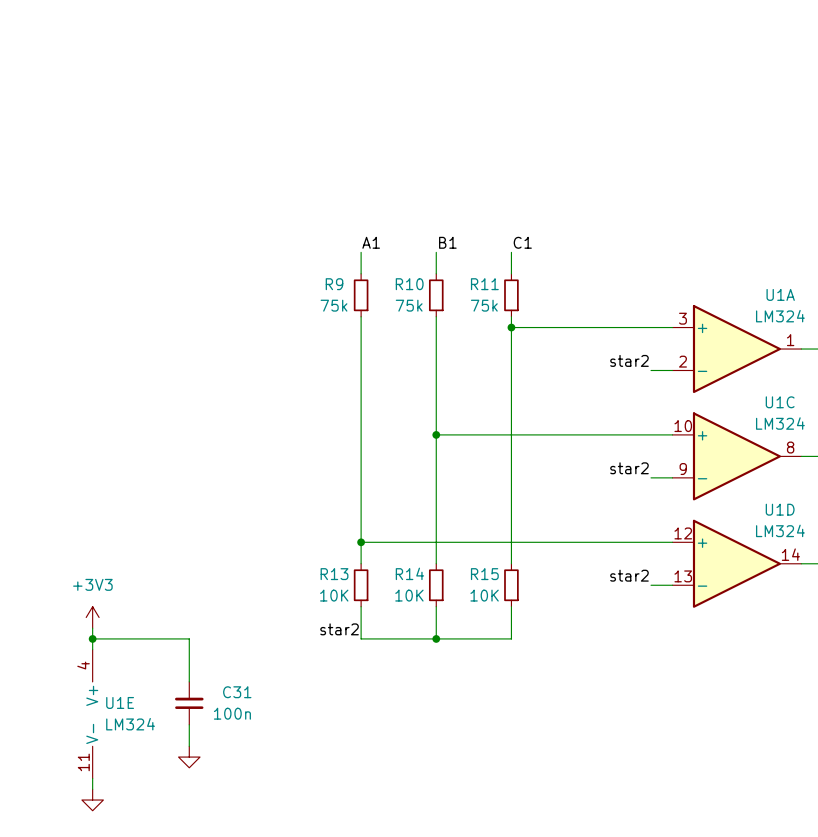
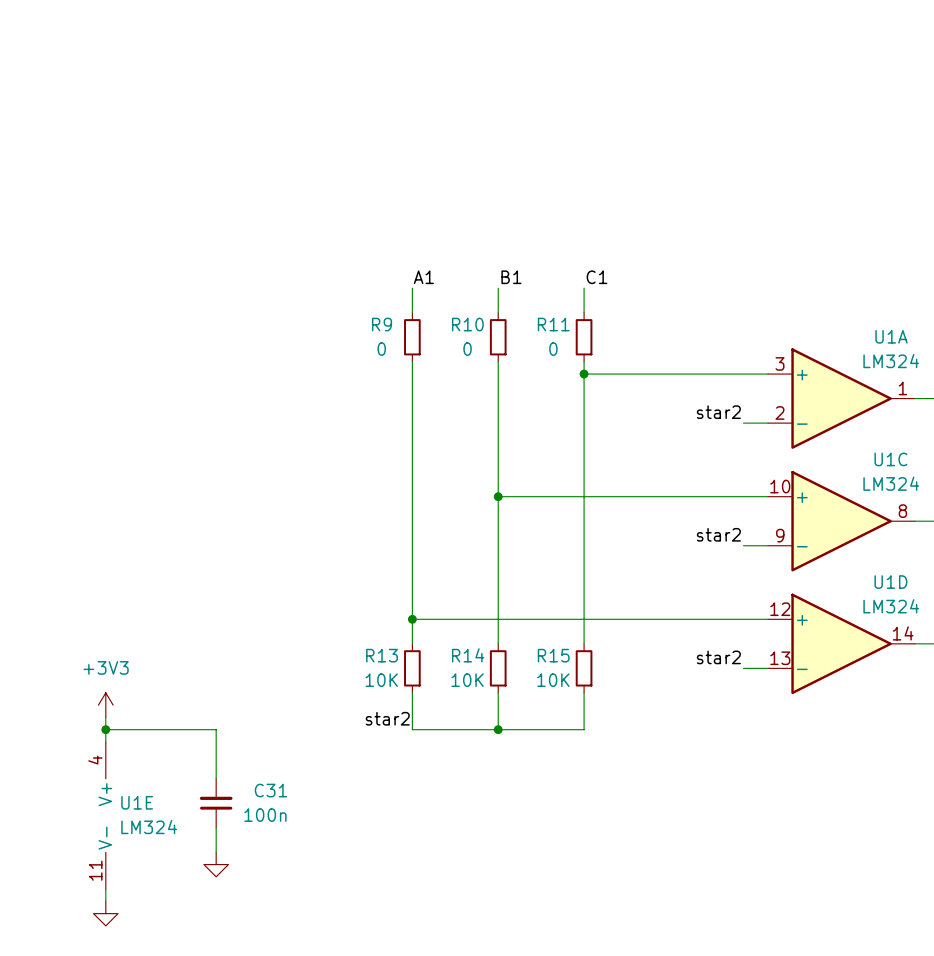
R9 value: 75k (334, 305) -> 0 (381, 349)
R10 value: 75k (409, 305) -> 0 (467, 349)
R11 value: 75k (484, 305) -> 0 (553, 349)

